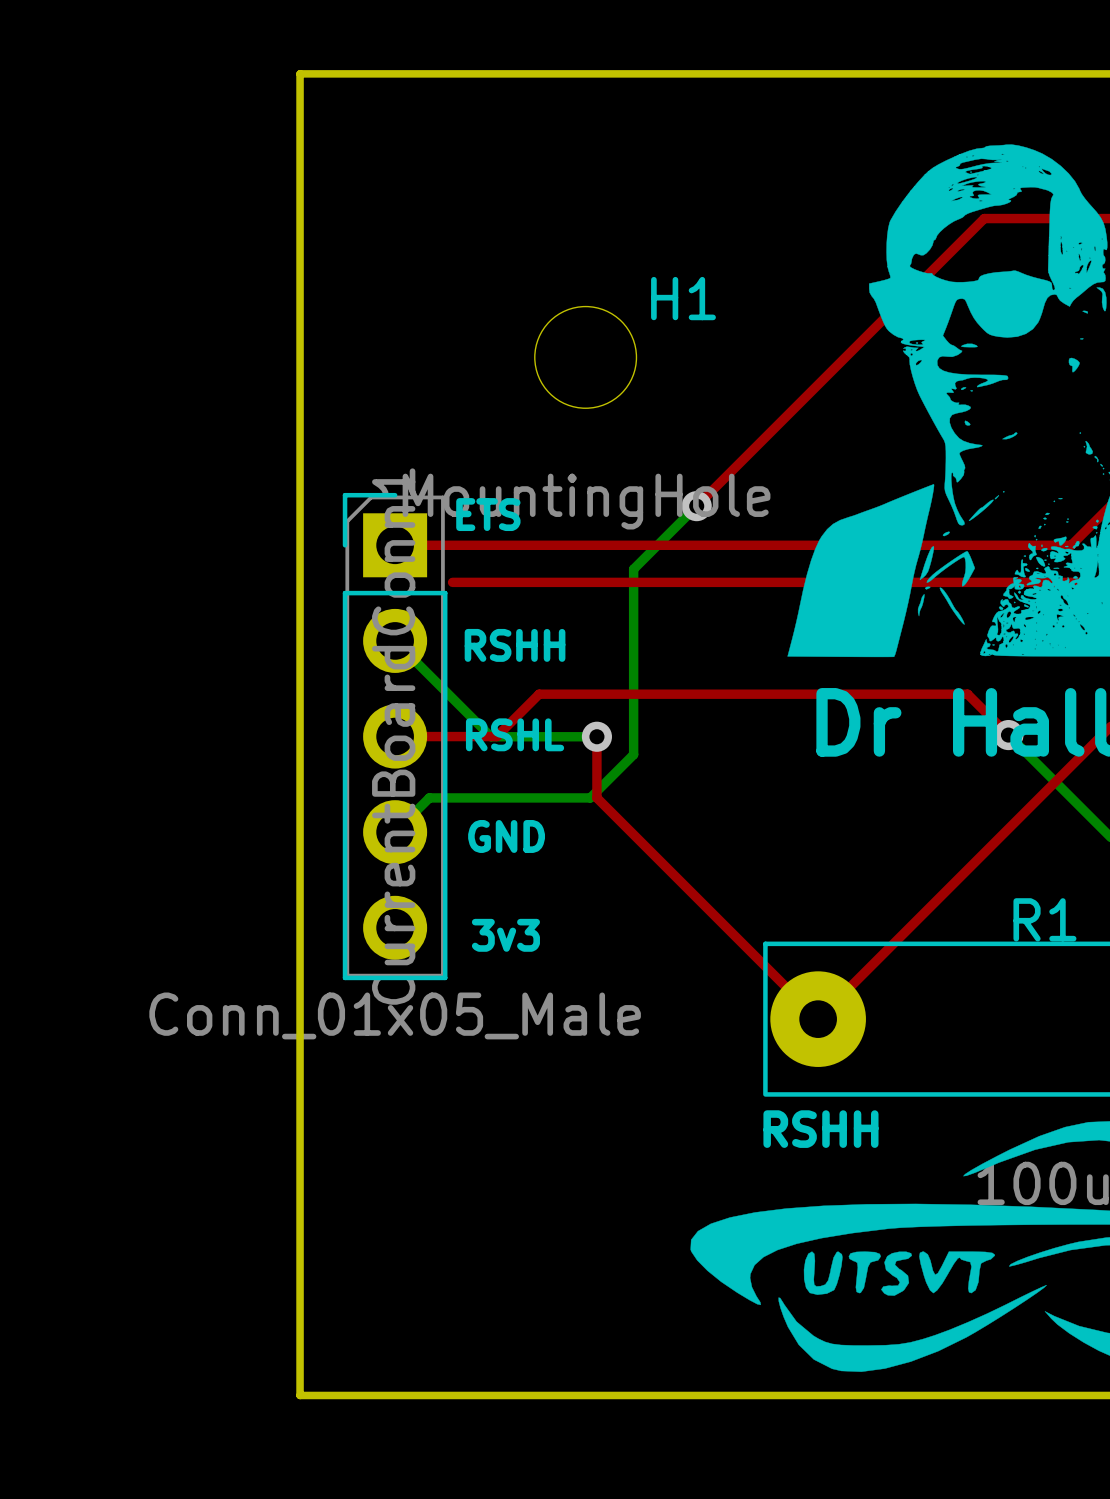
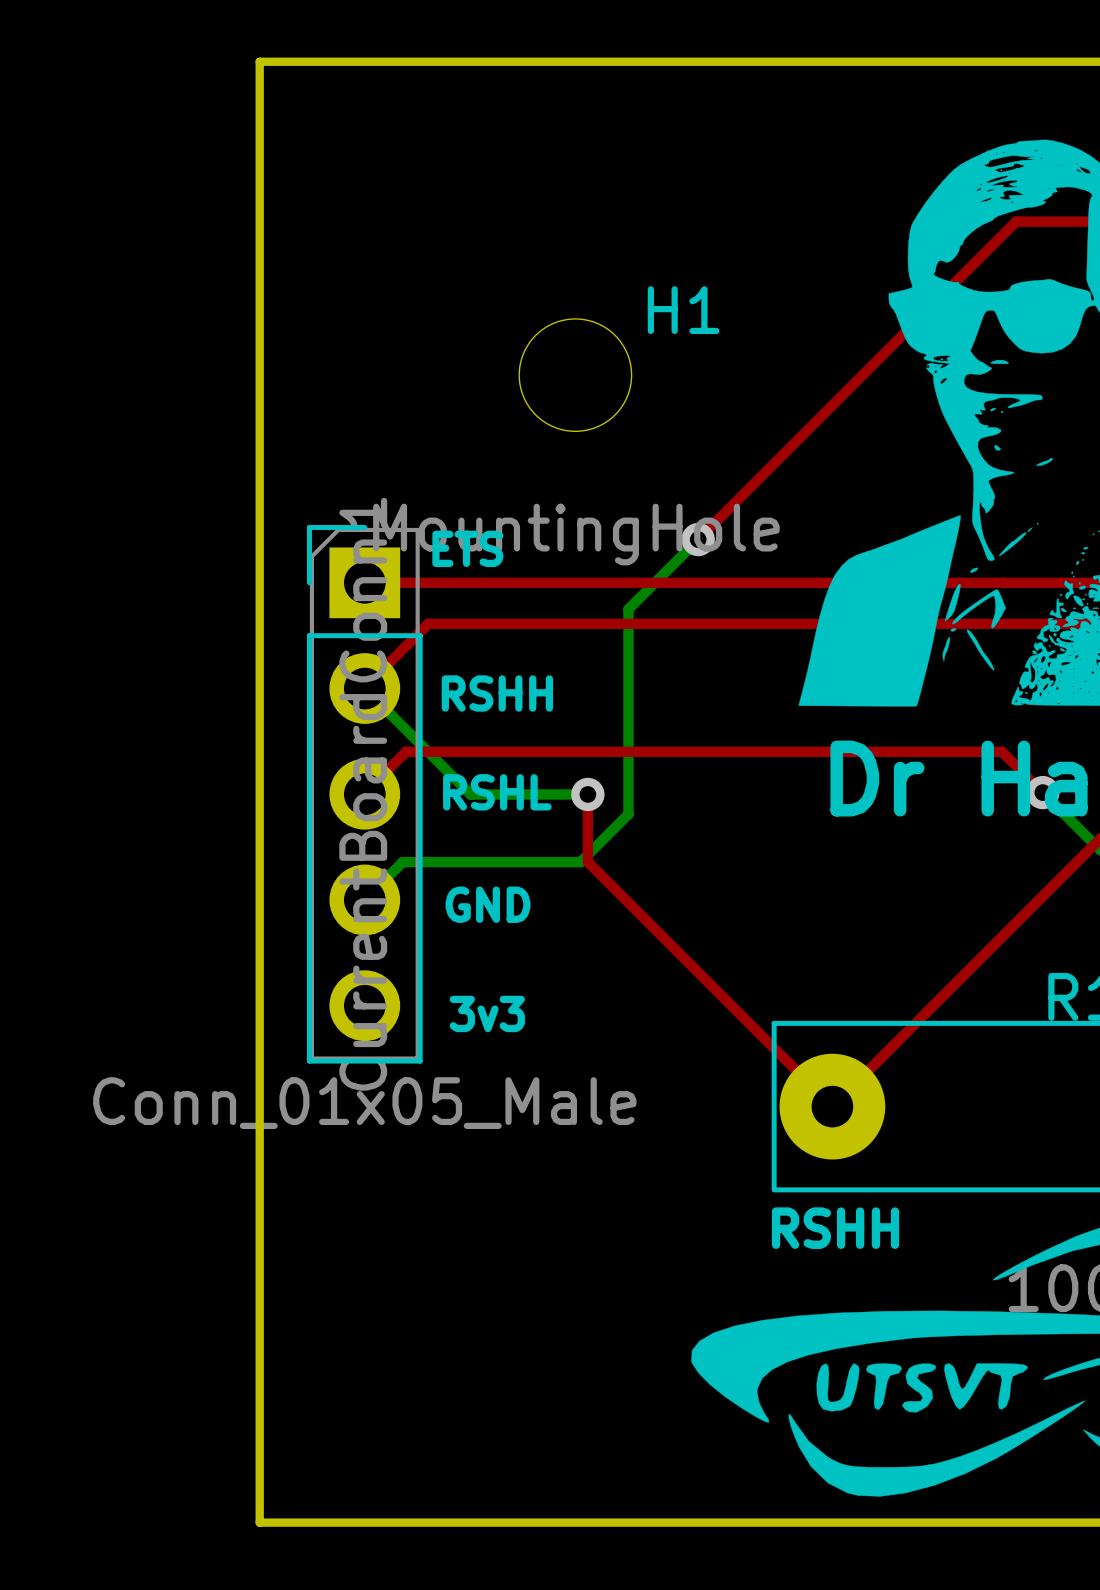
top track: none -> (428, 623) (365, 686)
top track: (971, 698) (967, 694) (539, 694) (496, 736) (395, 736) -> (1002, 751) (406, 751) (365, 792)

